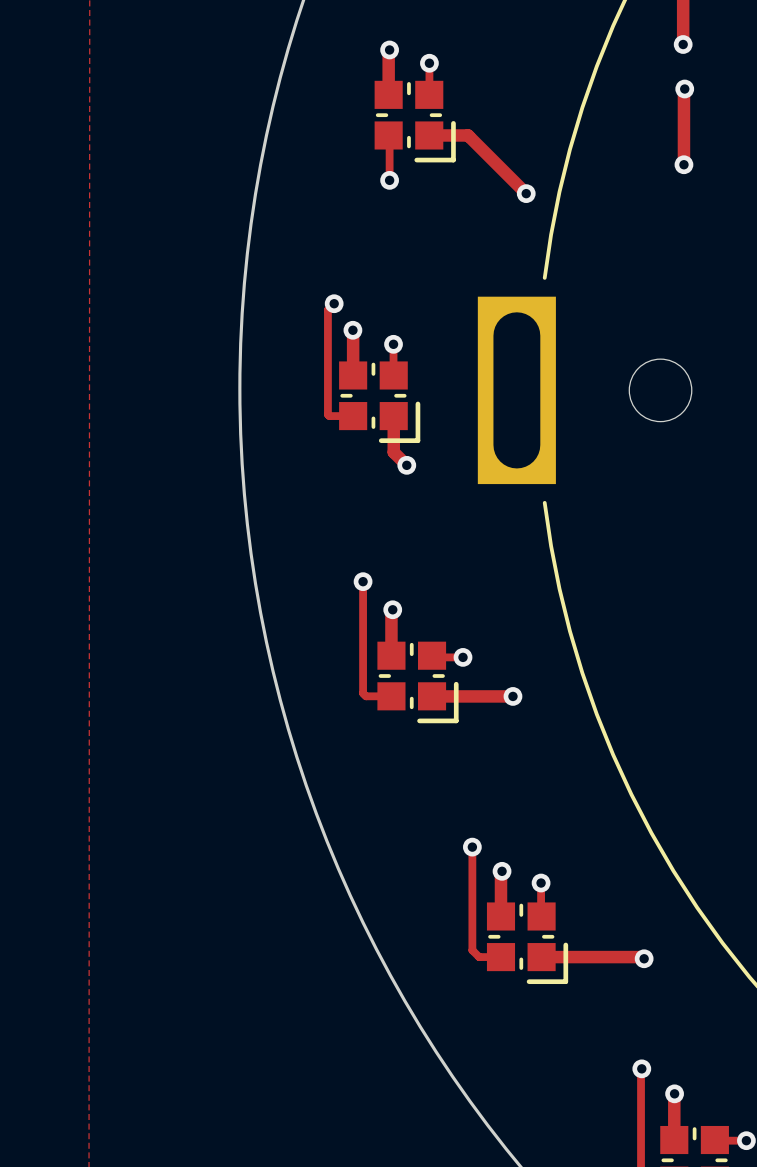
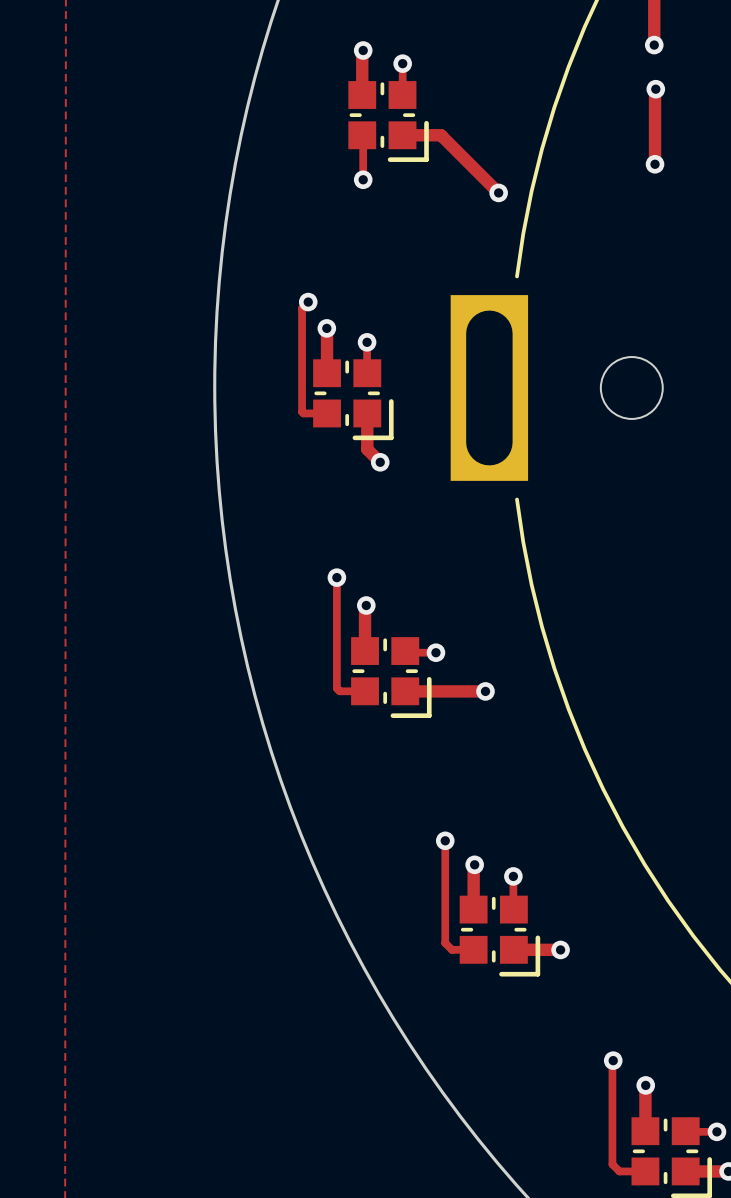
track: (588, 957) (642, 957) (644, 958) -> none
via position: (644, 958) -> (560, 949)

